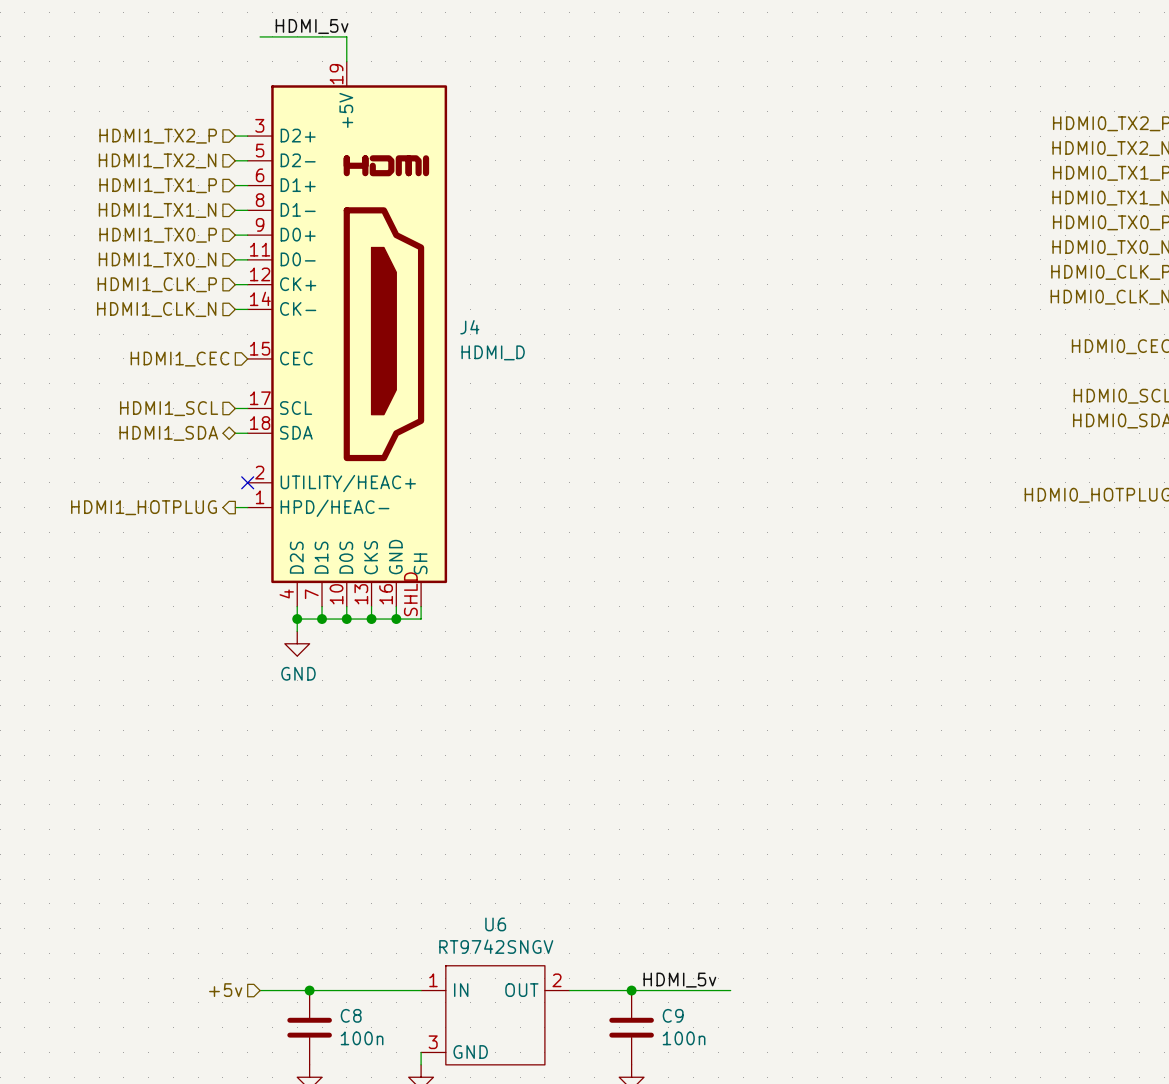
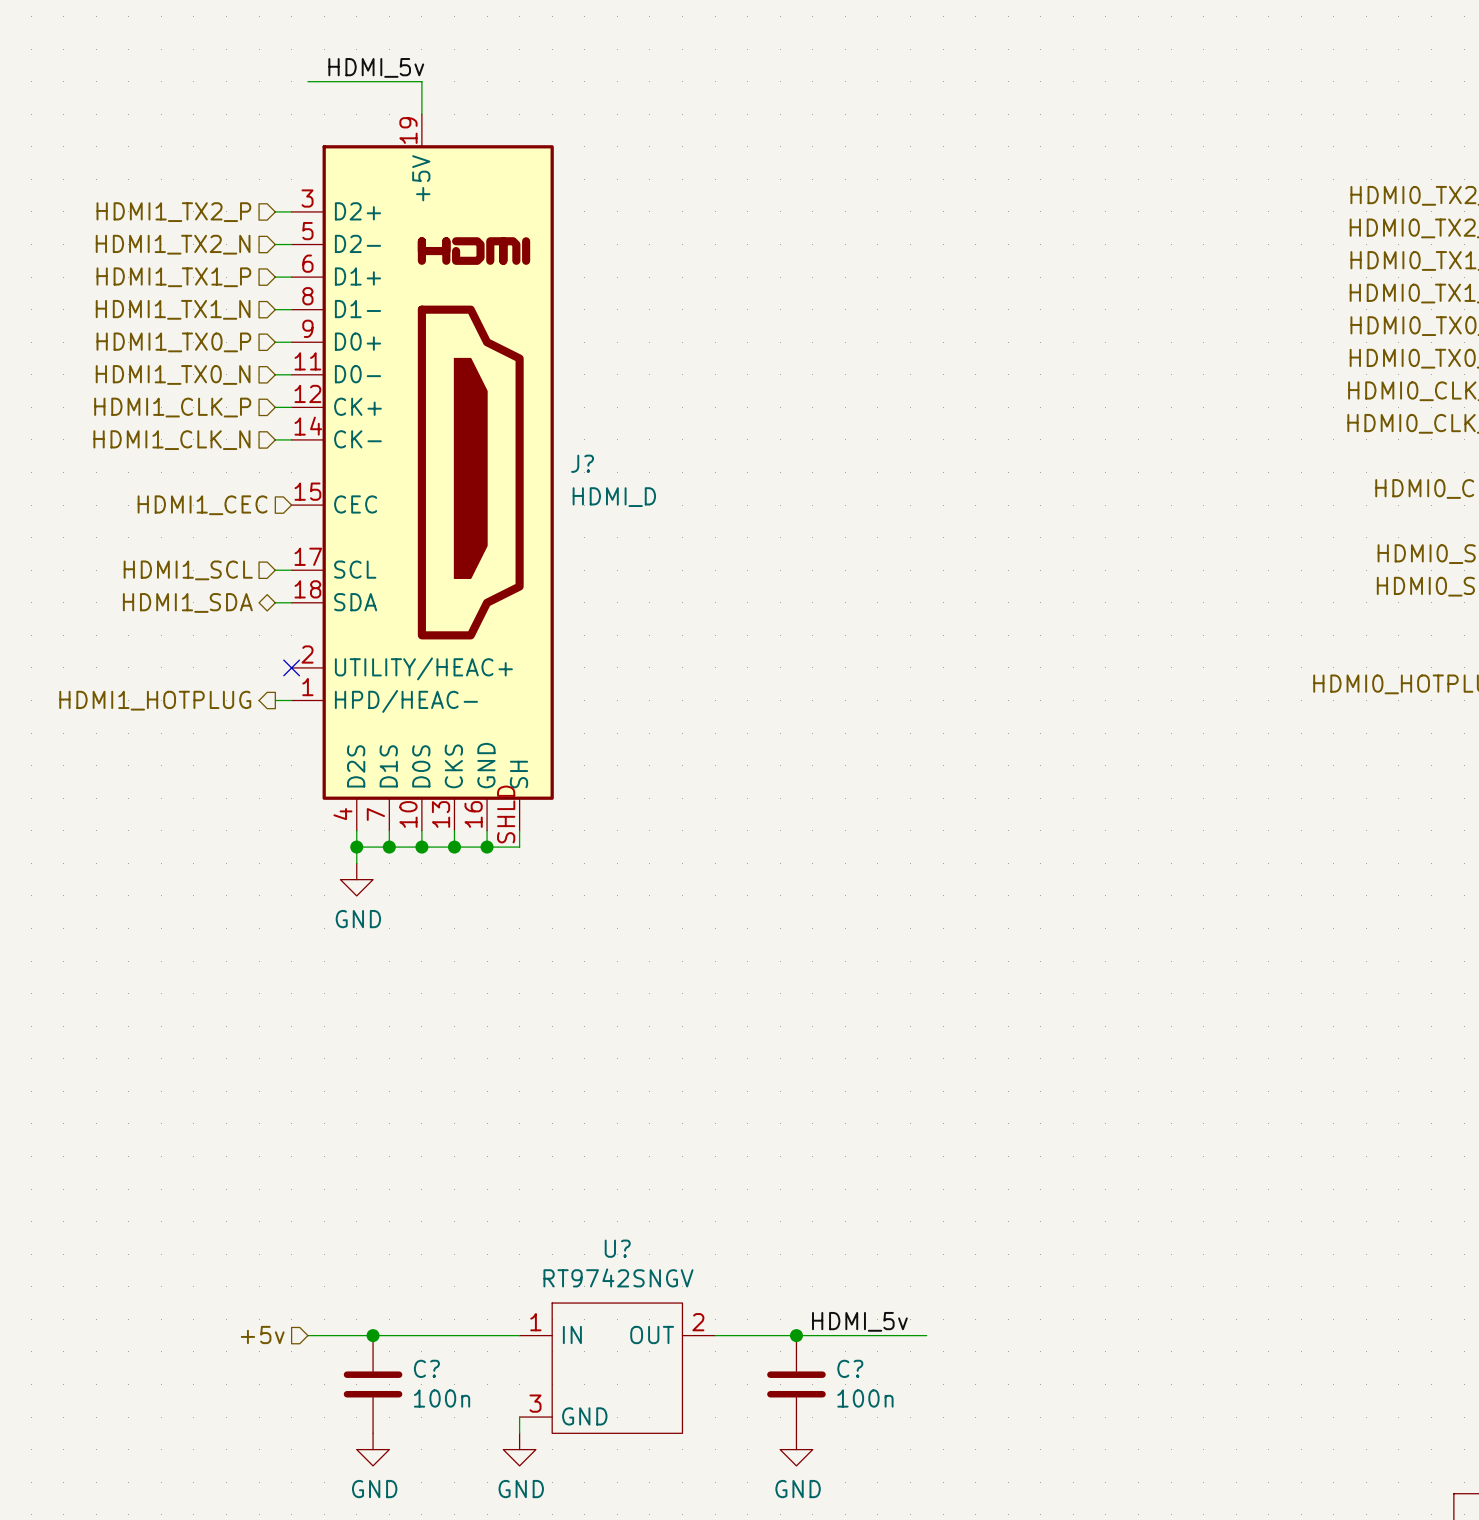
J4 name: J4 (469, 327) -> J? (582, 463)
U6 name: U6 (495, 924) -> U? (617, 1248)
C8 name: C8 (351, 1015) -> C? (426, 1368)
C9 name: C9 (673, 1015) -> C? (850, 1368)

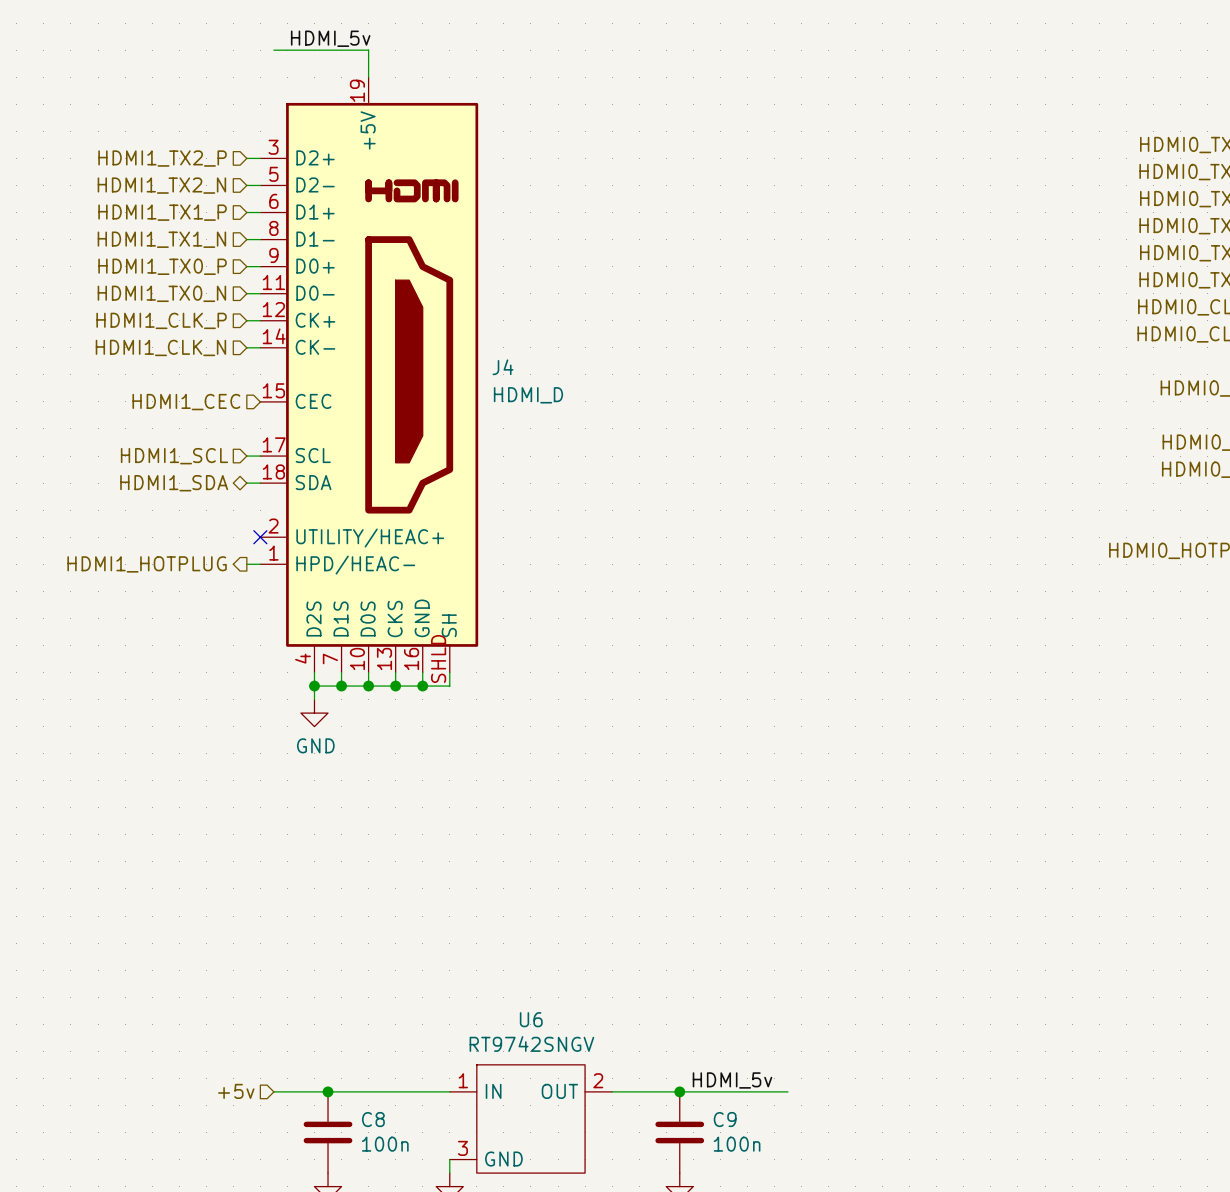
J? name: J? (582, 463) -> J4 (503, 367)
U? name: U? (617, 1248) -> U6 (531, 1019)
C? name: C? (426, 1368) -> C8 (373, 1119)
C? name: C? (850, 1368) -> C9 (725, 1119)

